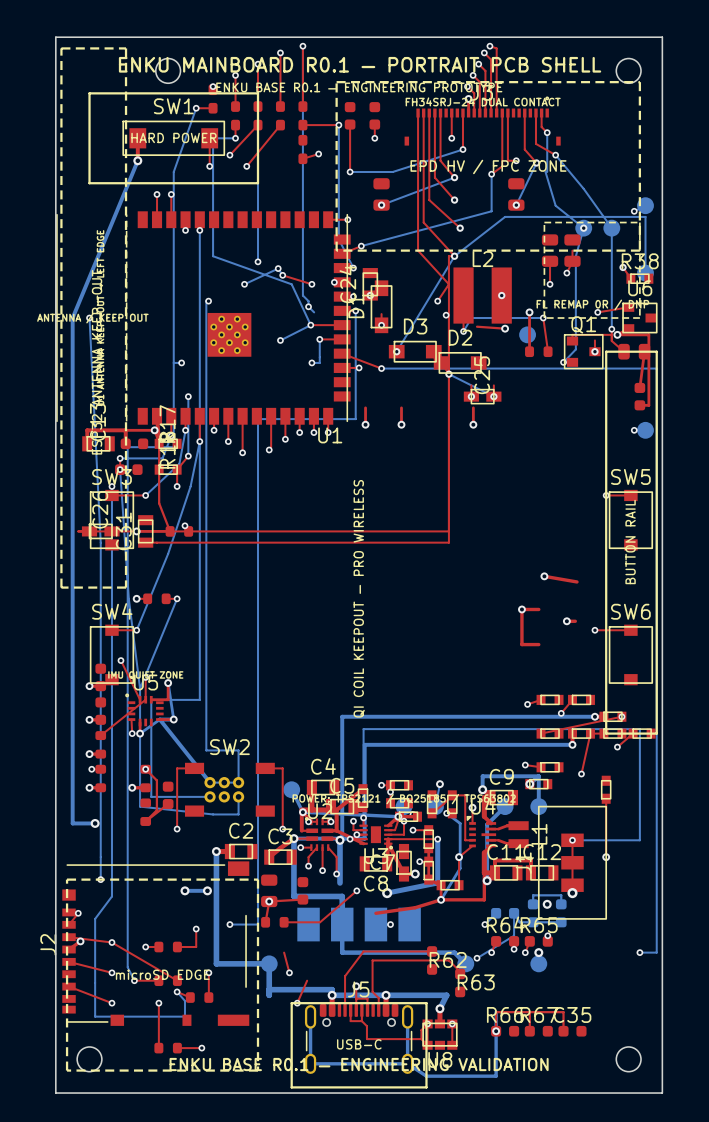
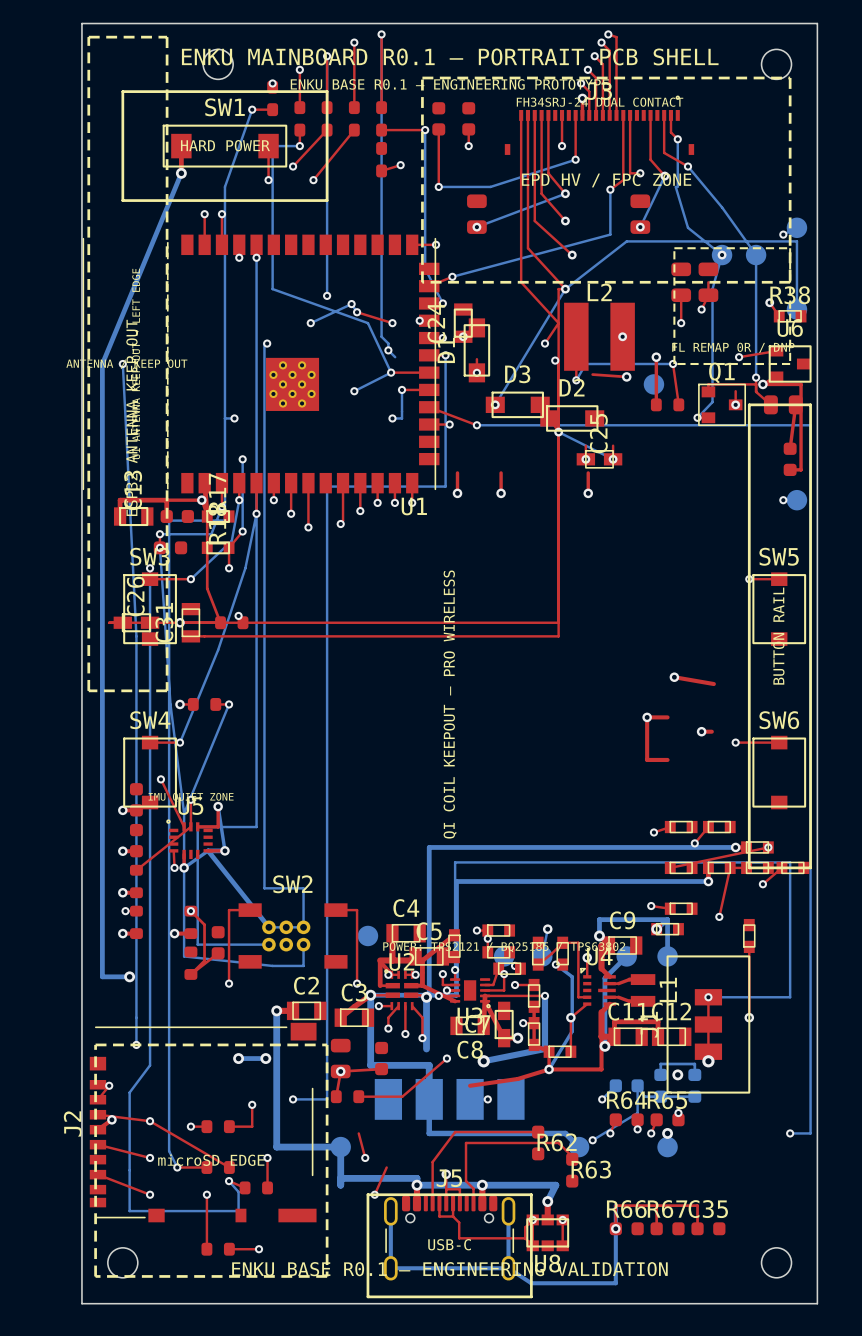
bottom track: (291, 789) (302, 812) (398, 816) -> none
via: (302, 812) -> none
via: (398, 816) -> none
top track: (417, 816) (398, 816) (388, 825) -> none

